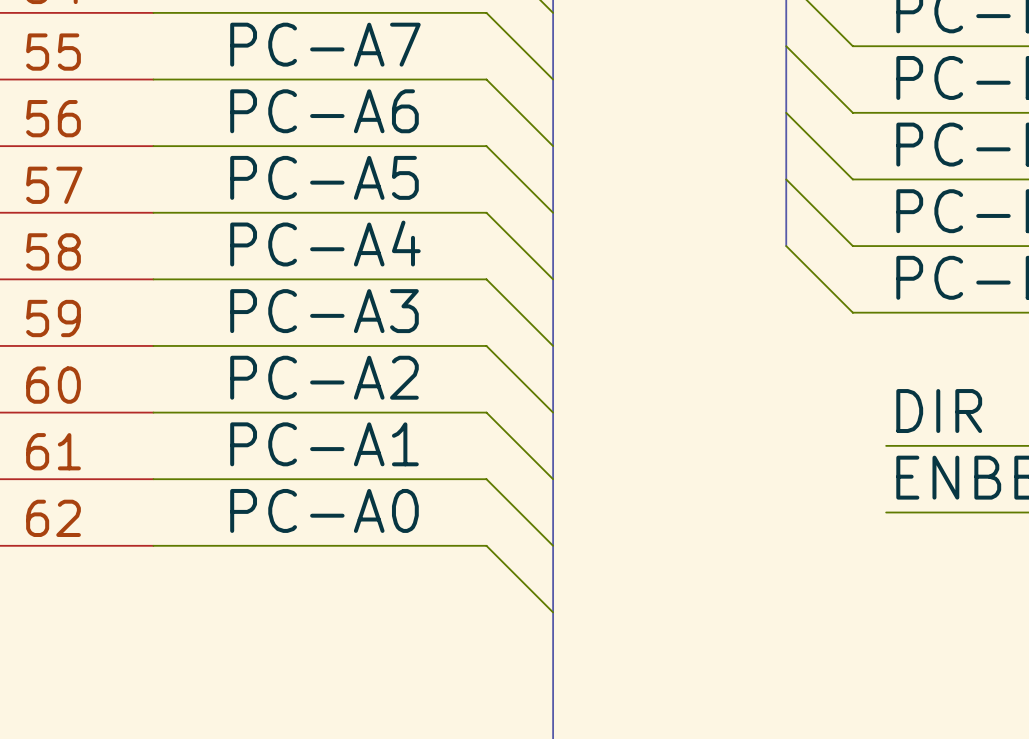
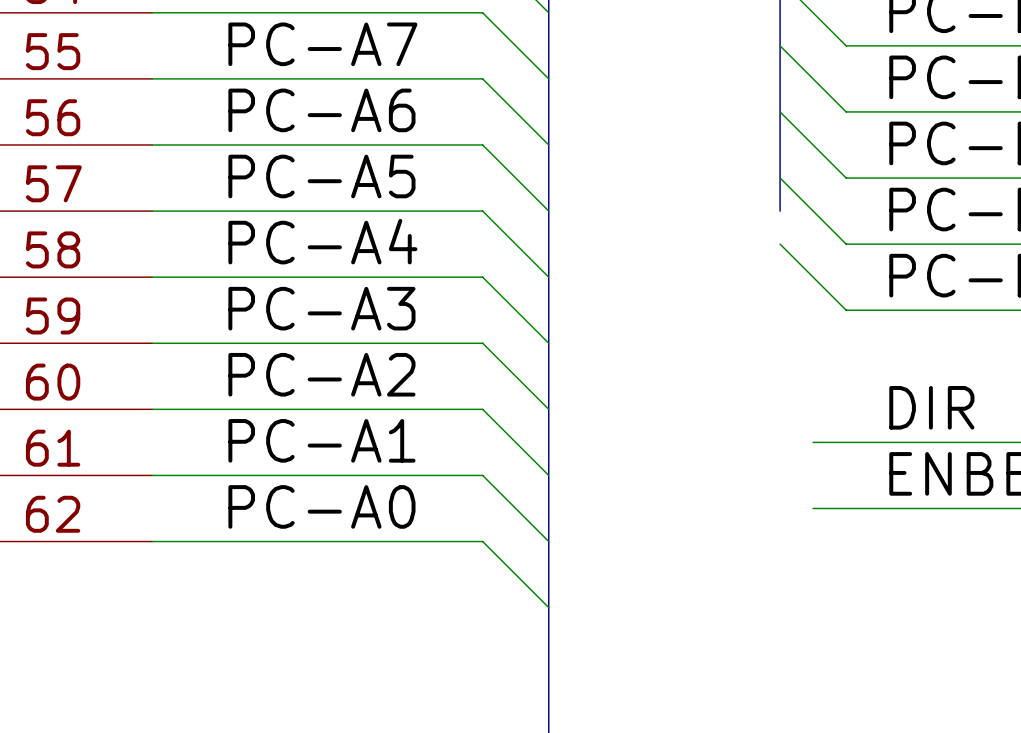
bus: (786, 212) (786, 246) -> none
wire: none -> (813, 442) (879, 442)
wire: none -> (813, 508) (879, 508)

